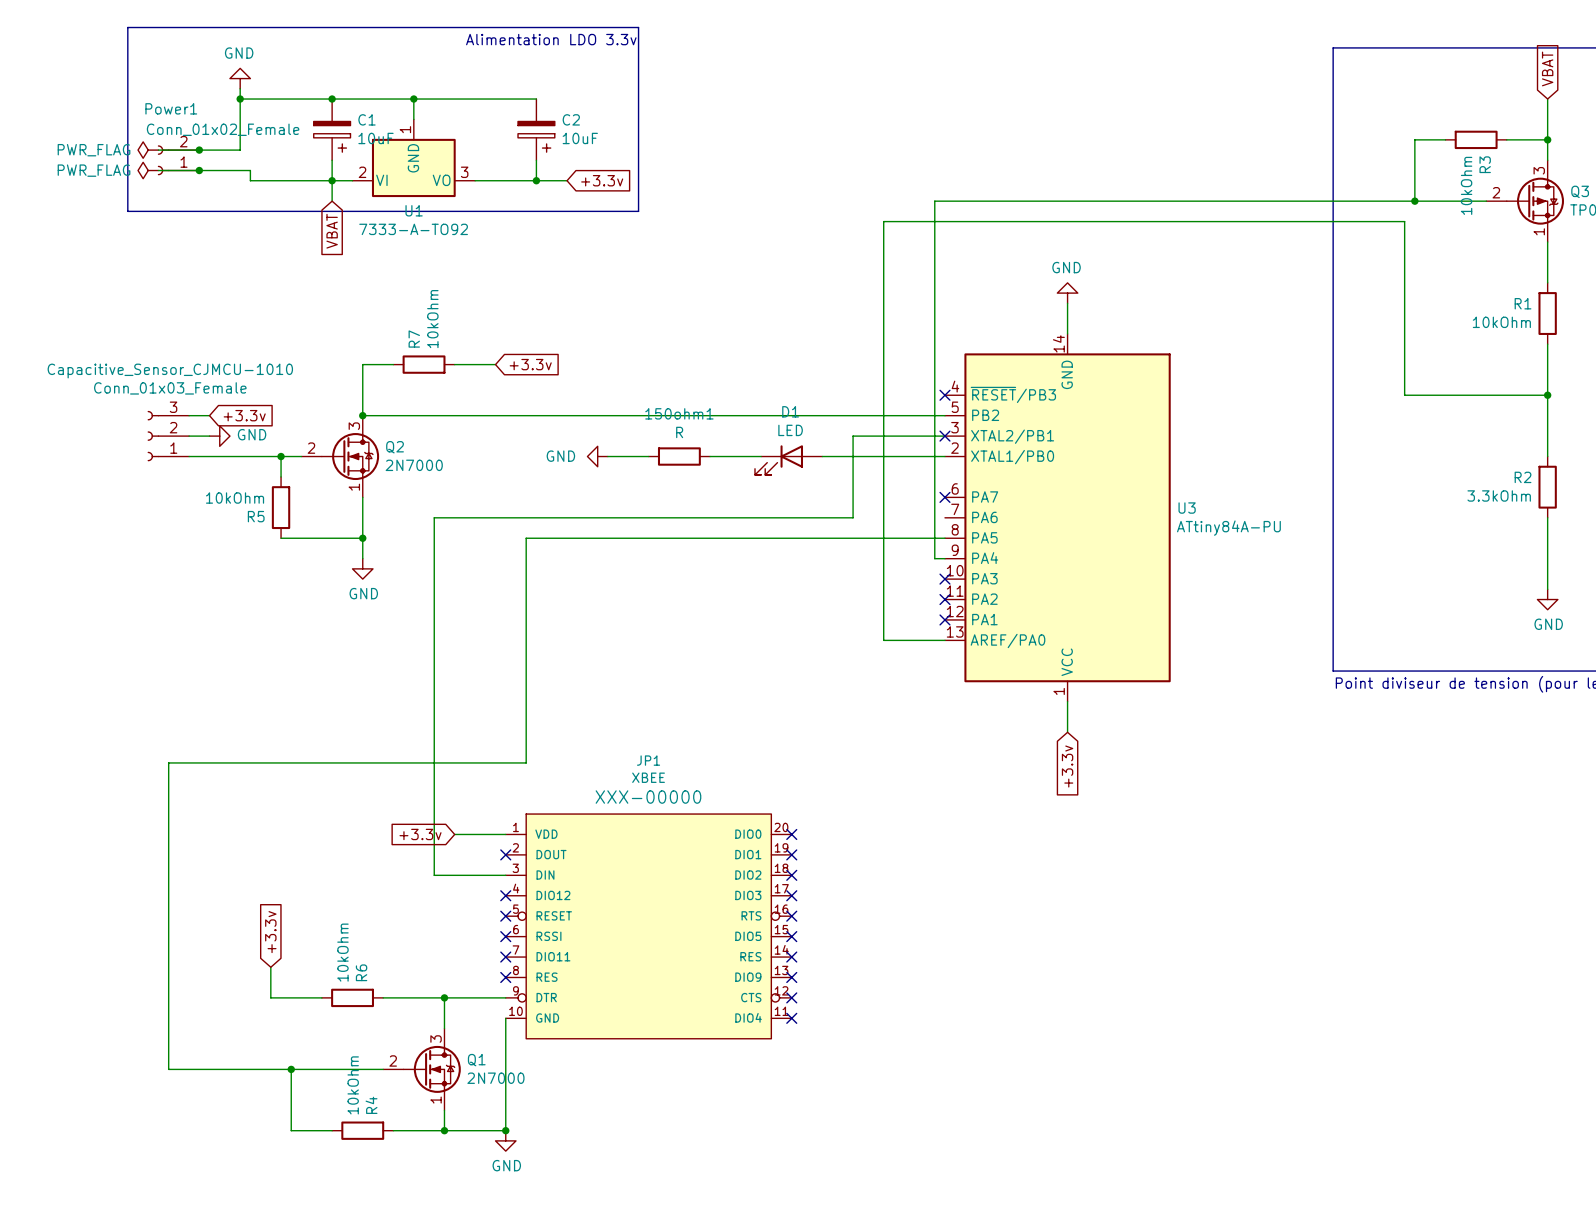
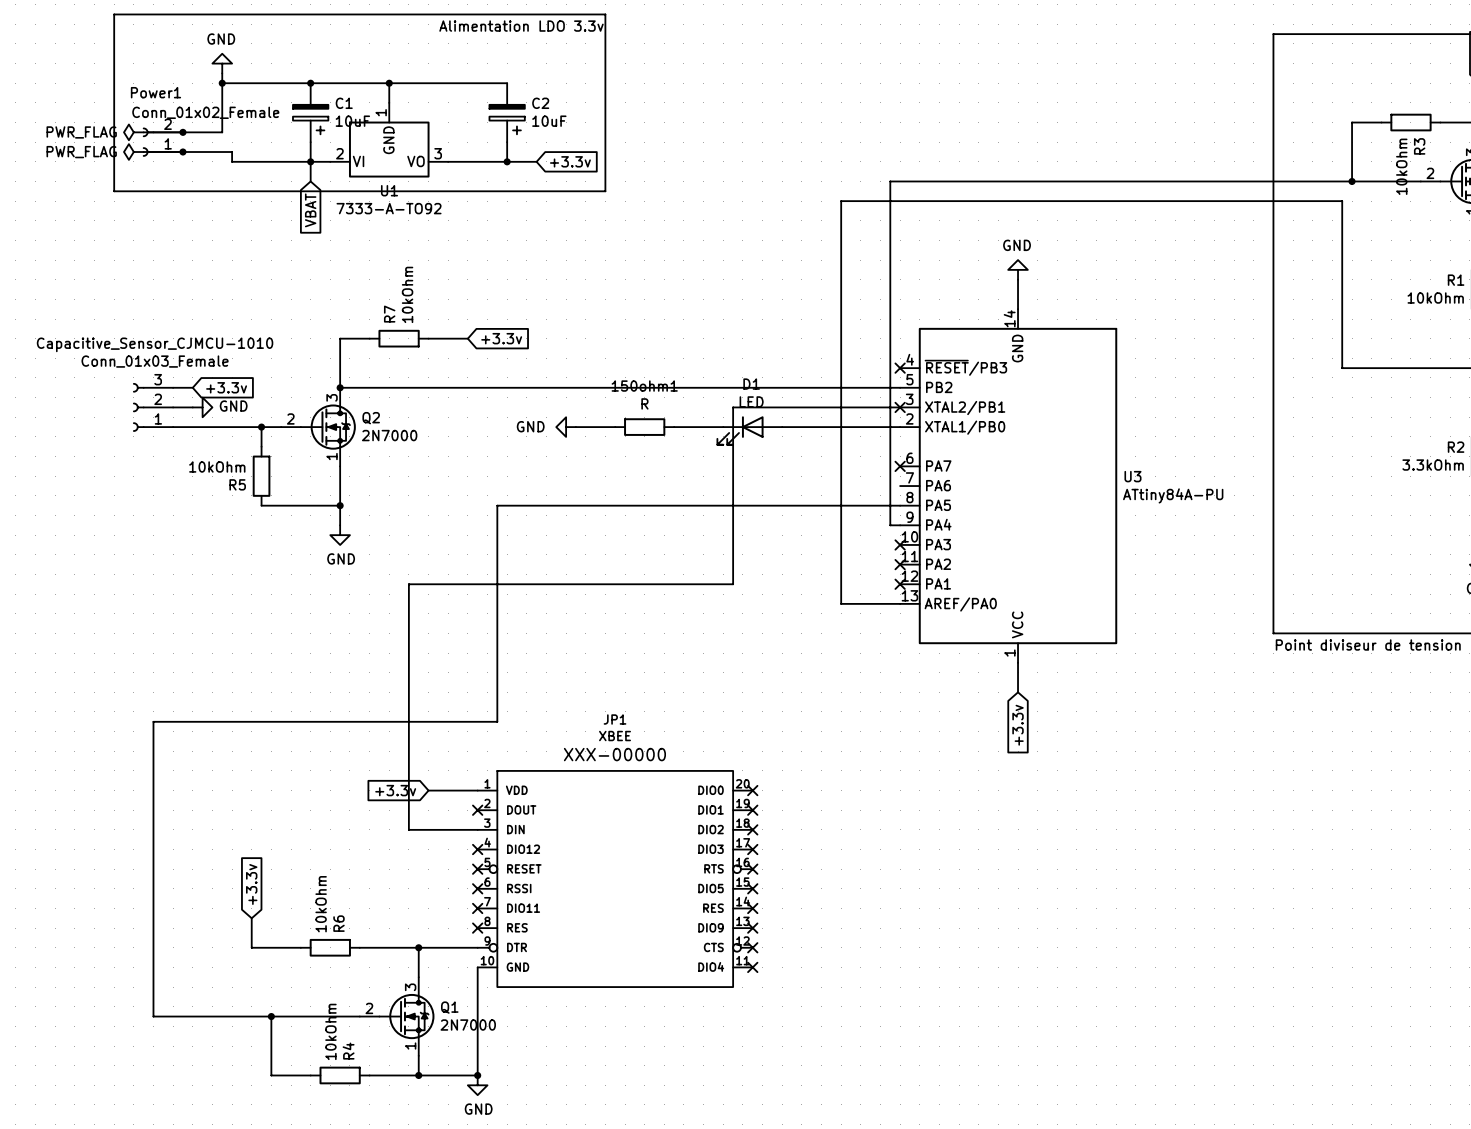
wire: (853, 436) (853, 517) (434, 517) (434, 619) -> (811, 407) (733, 407) (733, 584) (408, 584)

